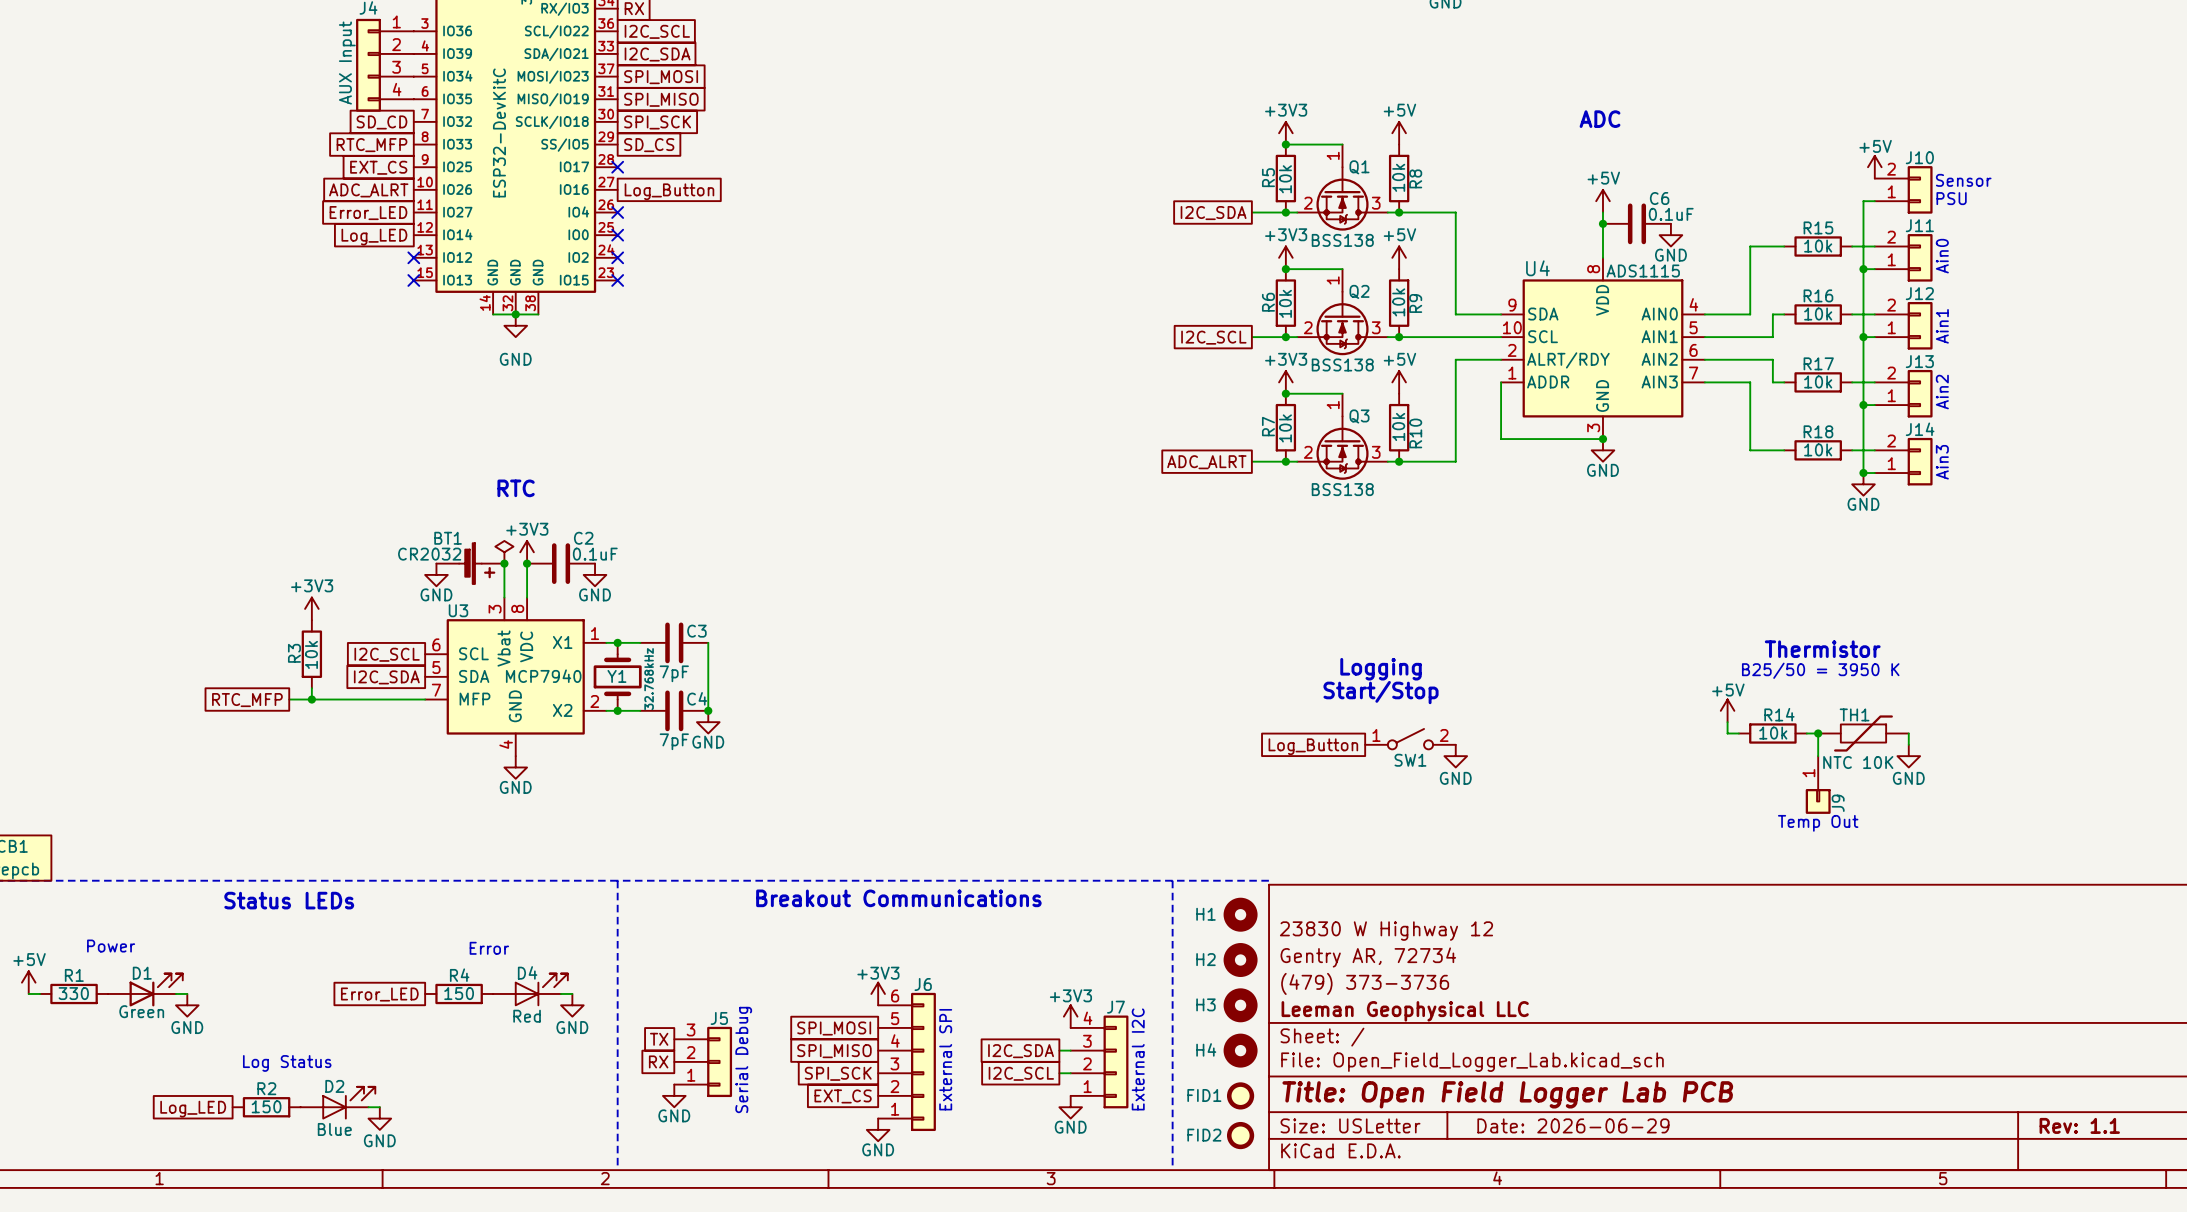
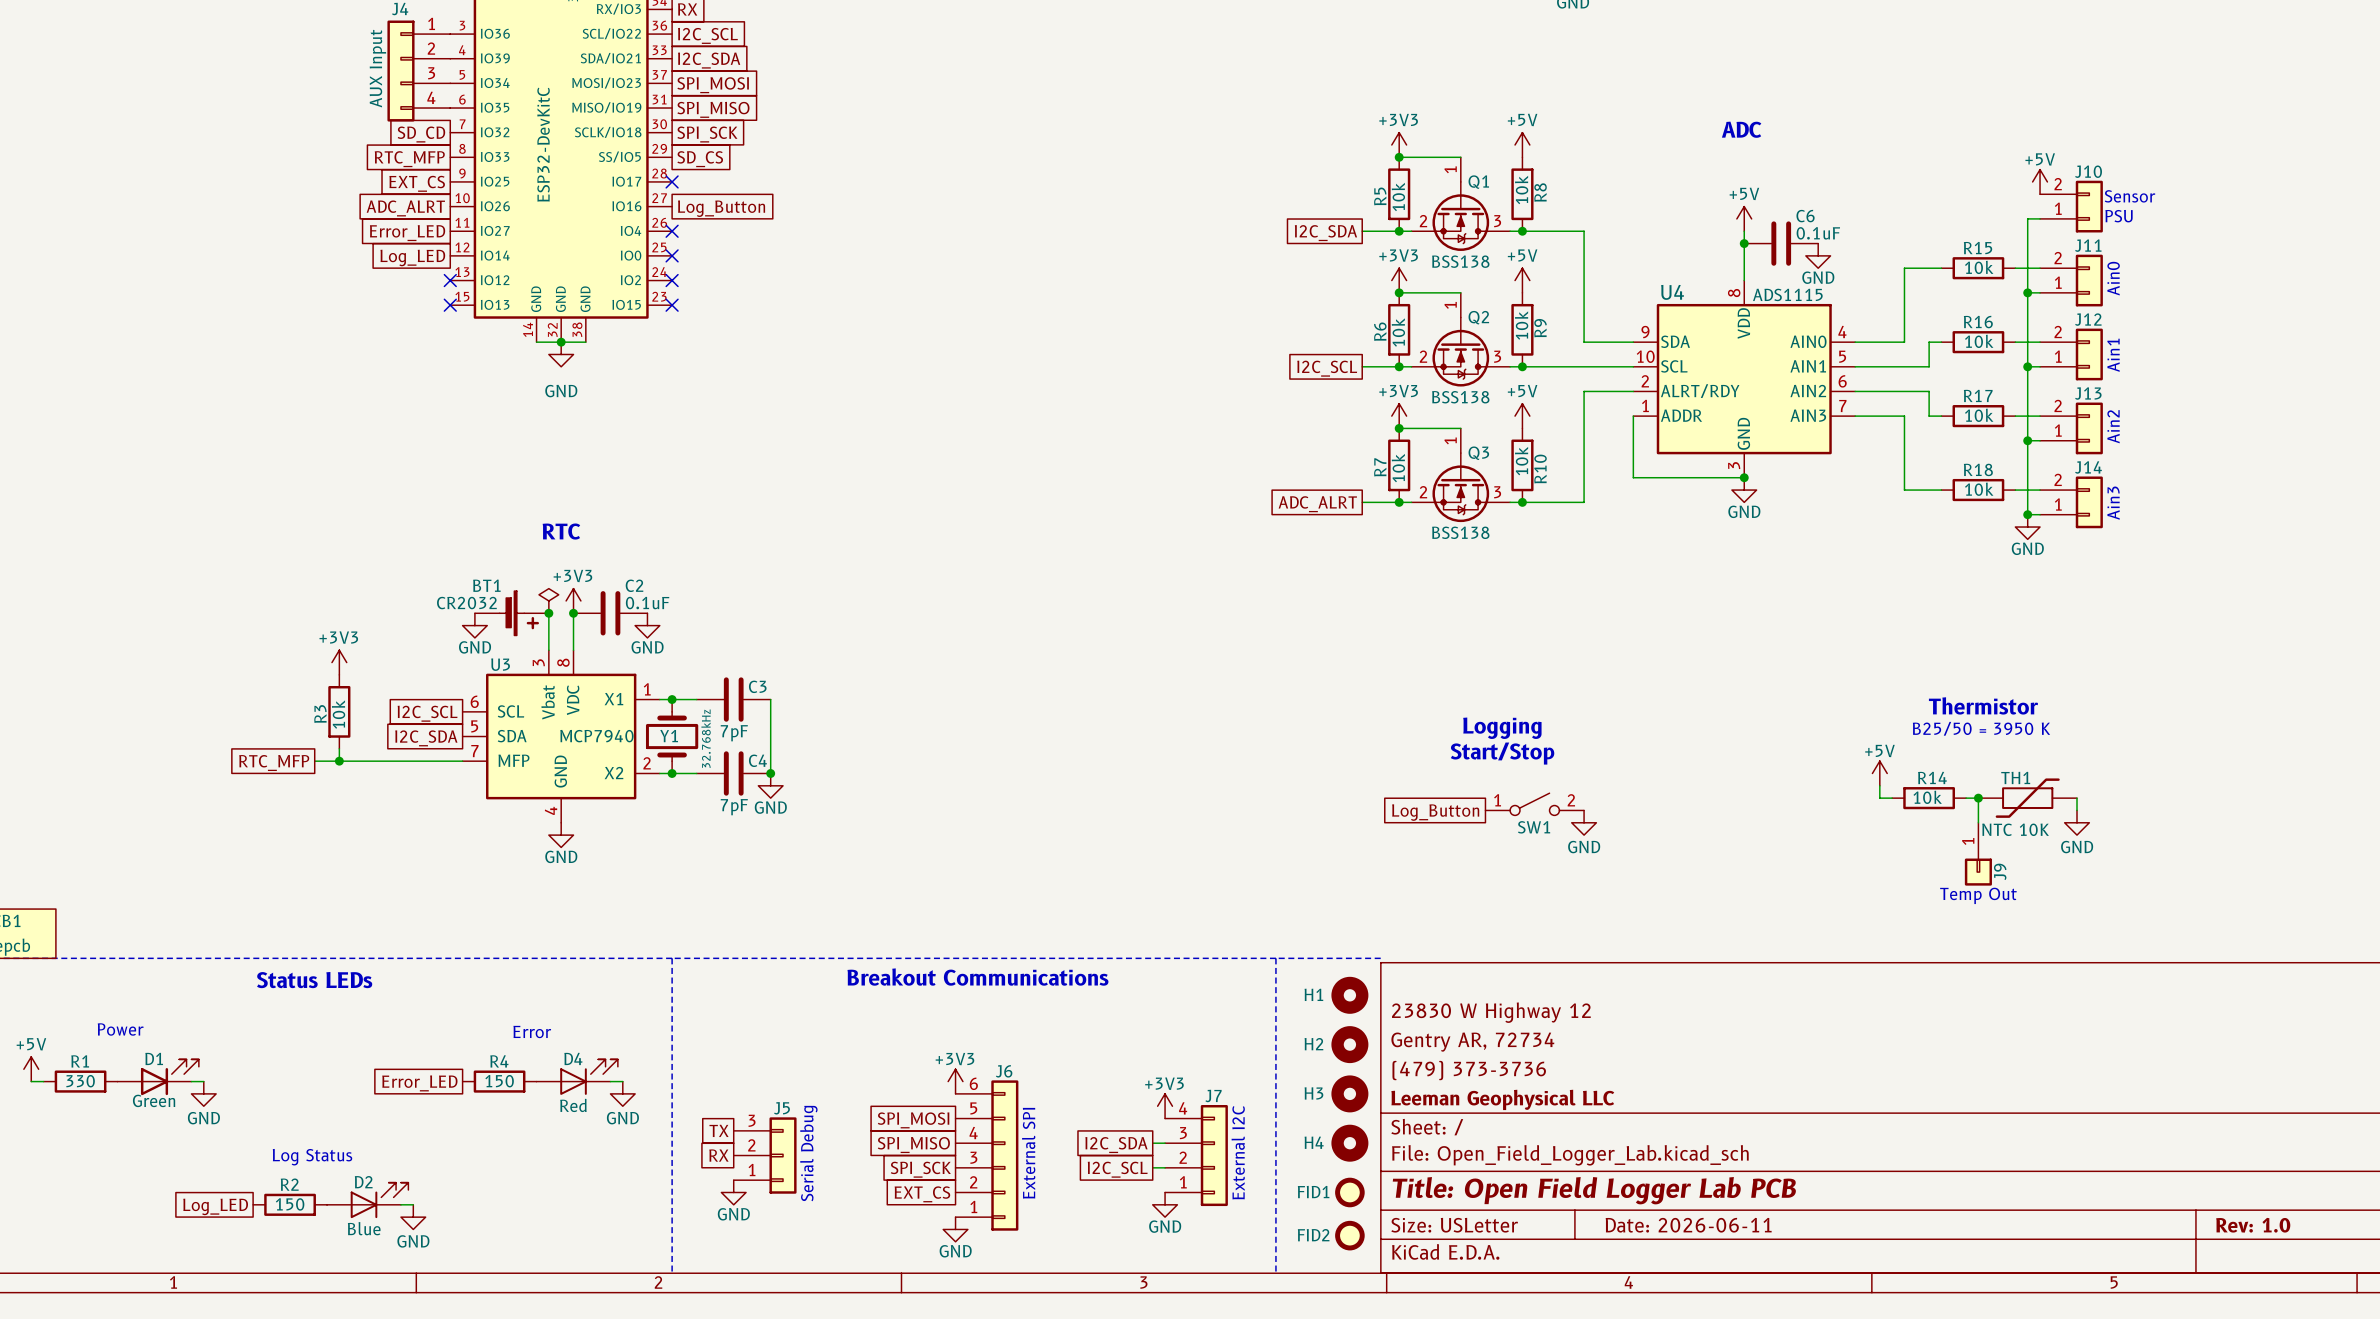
title block: Date: 2026-06-29 (1573, 1125) -> Date: 2026-06-11 (1688, 1225)
title block: Rev: 1.1 (2079, 1125) -> Rev: 1.0 (2253, 1225)

